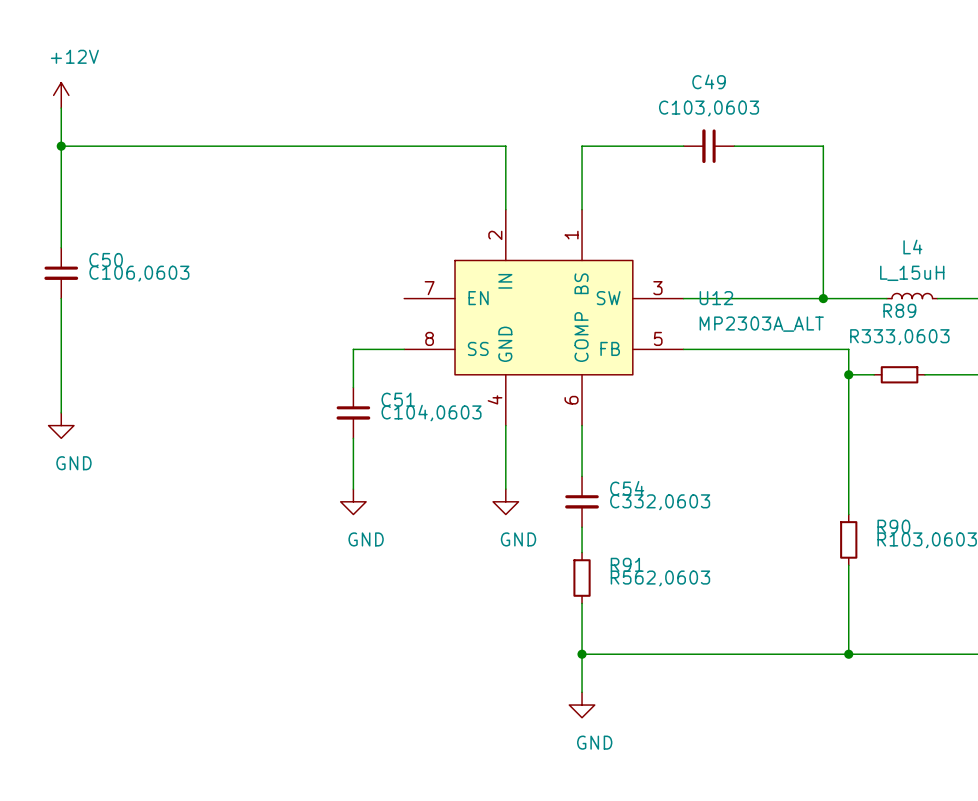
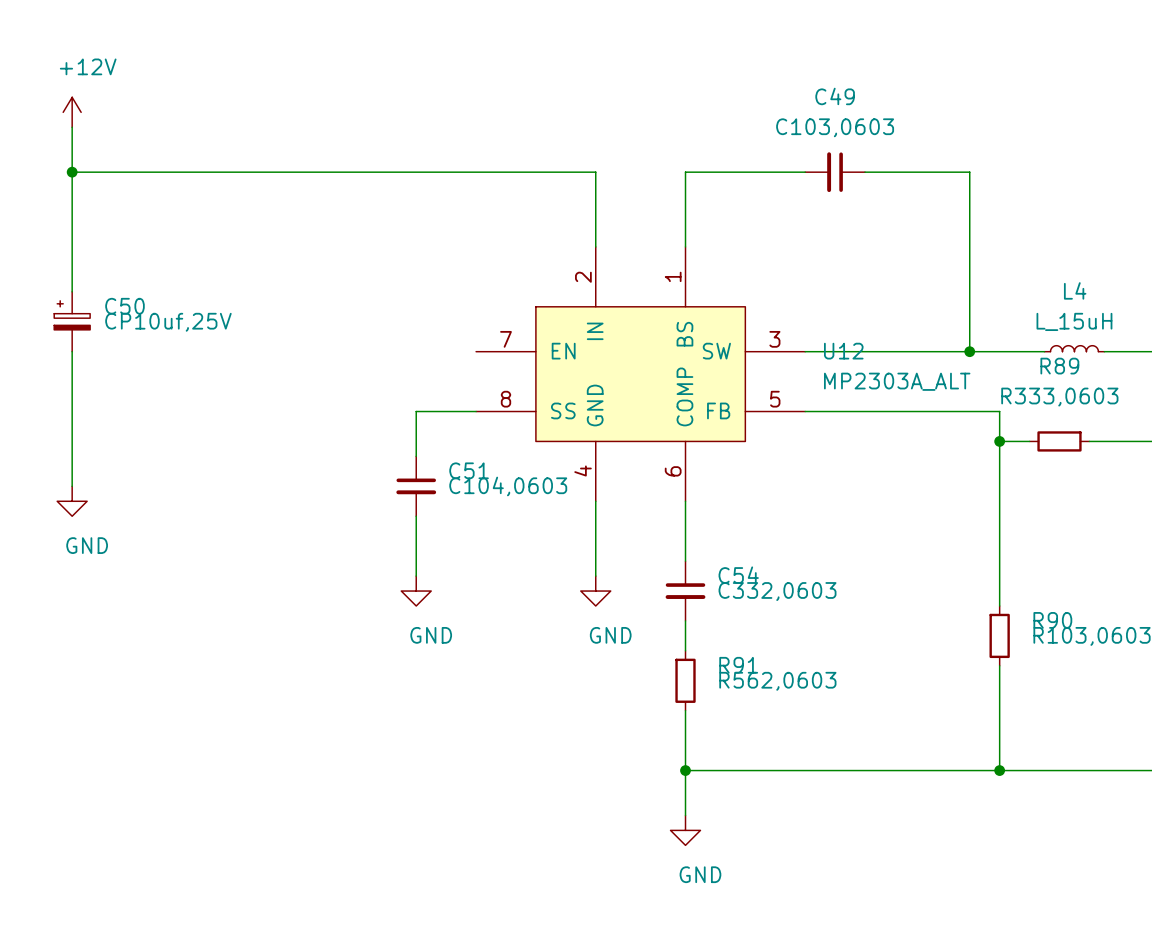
C50 symbol: [44, 247, 79, 299] -> [54, 291, 91, 352]
C50 value: C106,0603 (139, 273) -> CP10uf,25V (168, 322)

